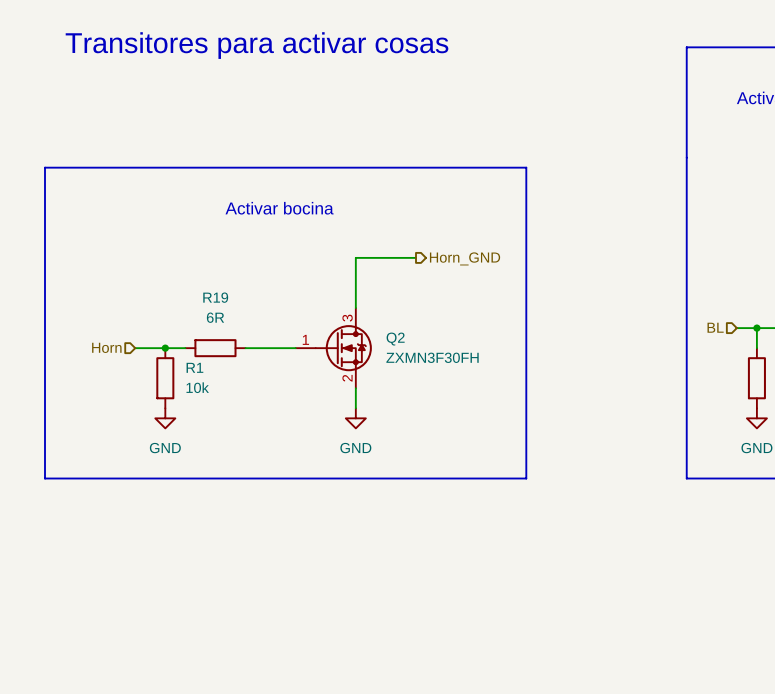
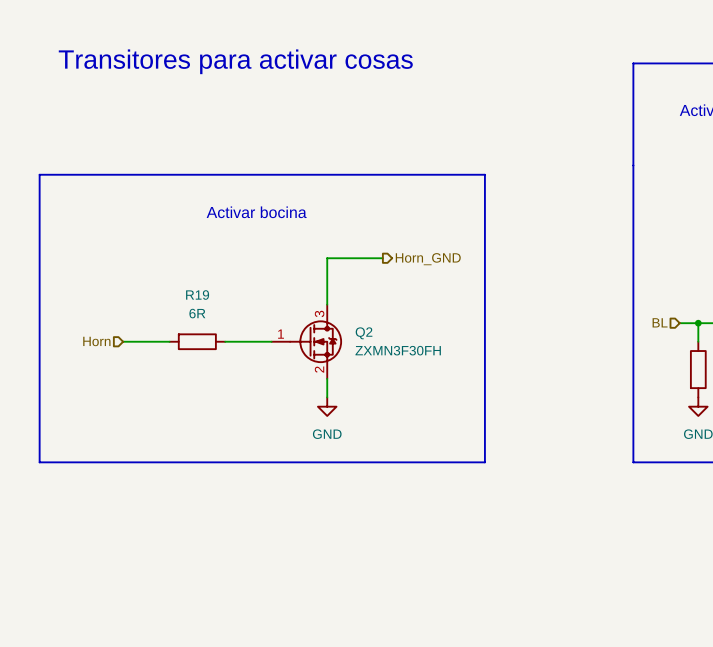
junction: (165, 348) -> none
R1: 10k (165, 378) -> none
power symbol: GND (165, 418) -> none

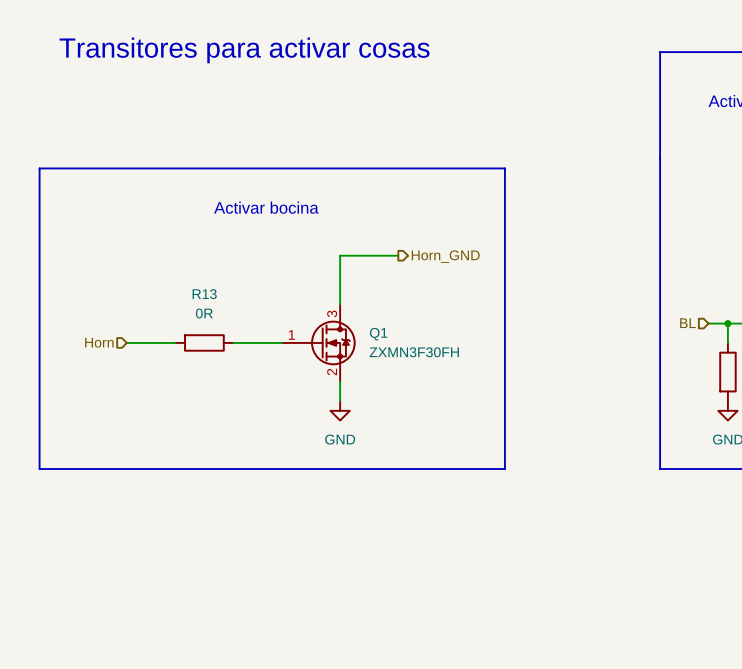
R19 name: R19 (197, 295) -> R13 (204, 294)
R19 value: 6R (197, 313) -> 0R (204, 313)
Q2 name: Q2 (364, 333) -> Q1 (378, 334)

